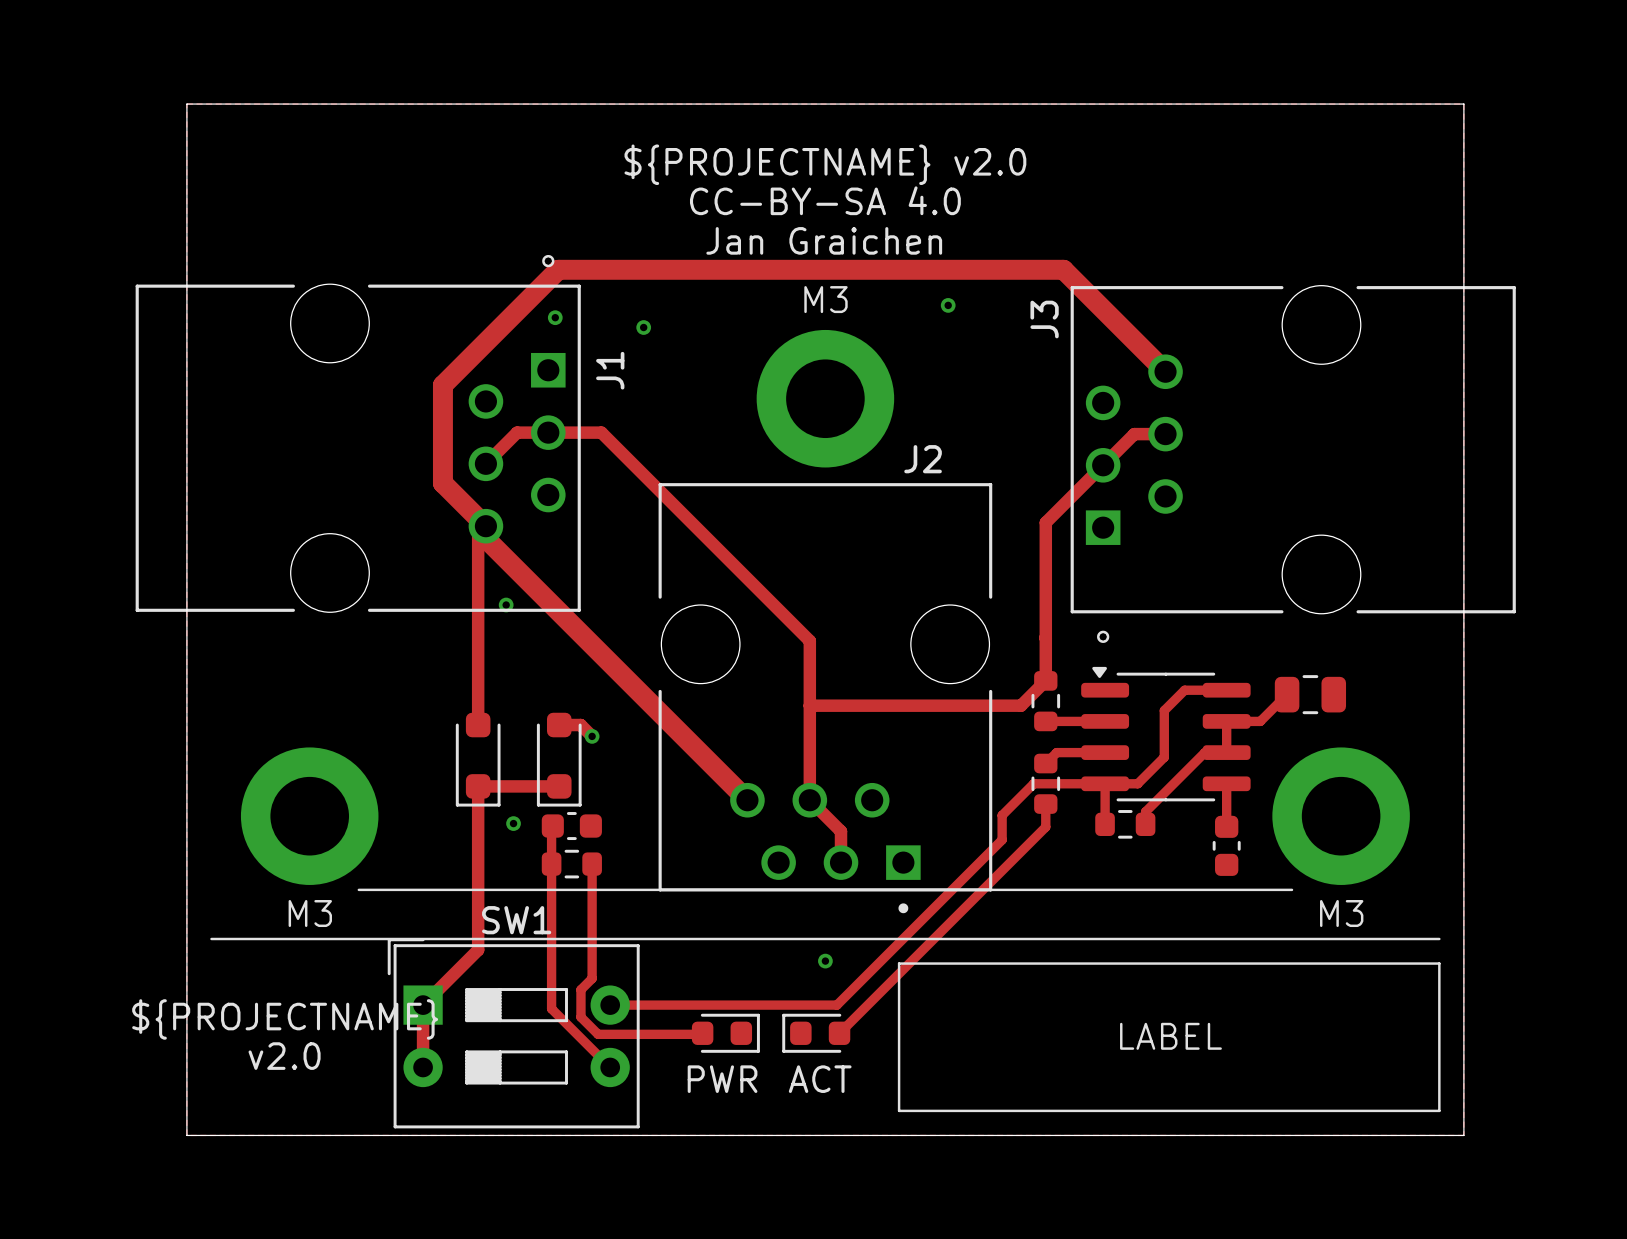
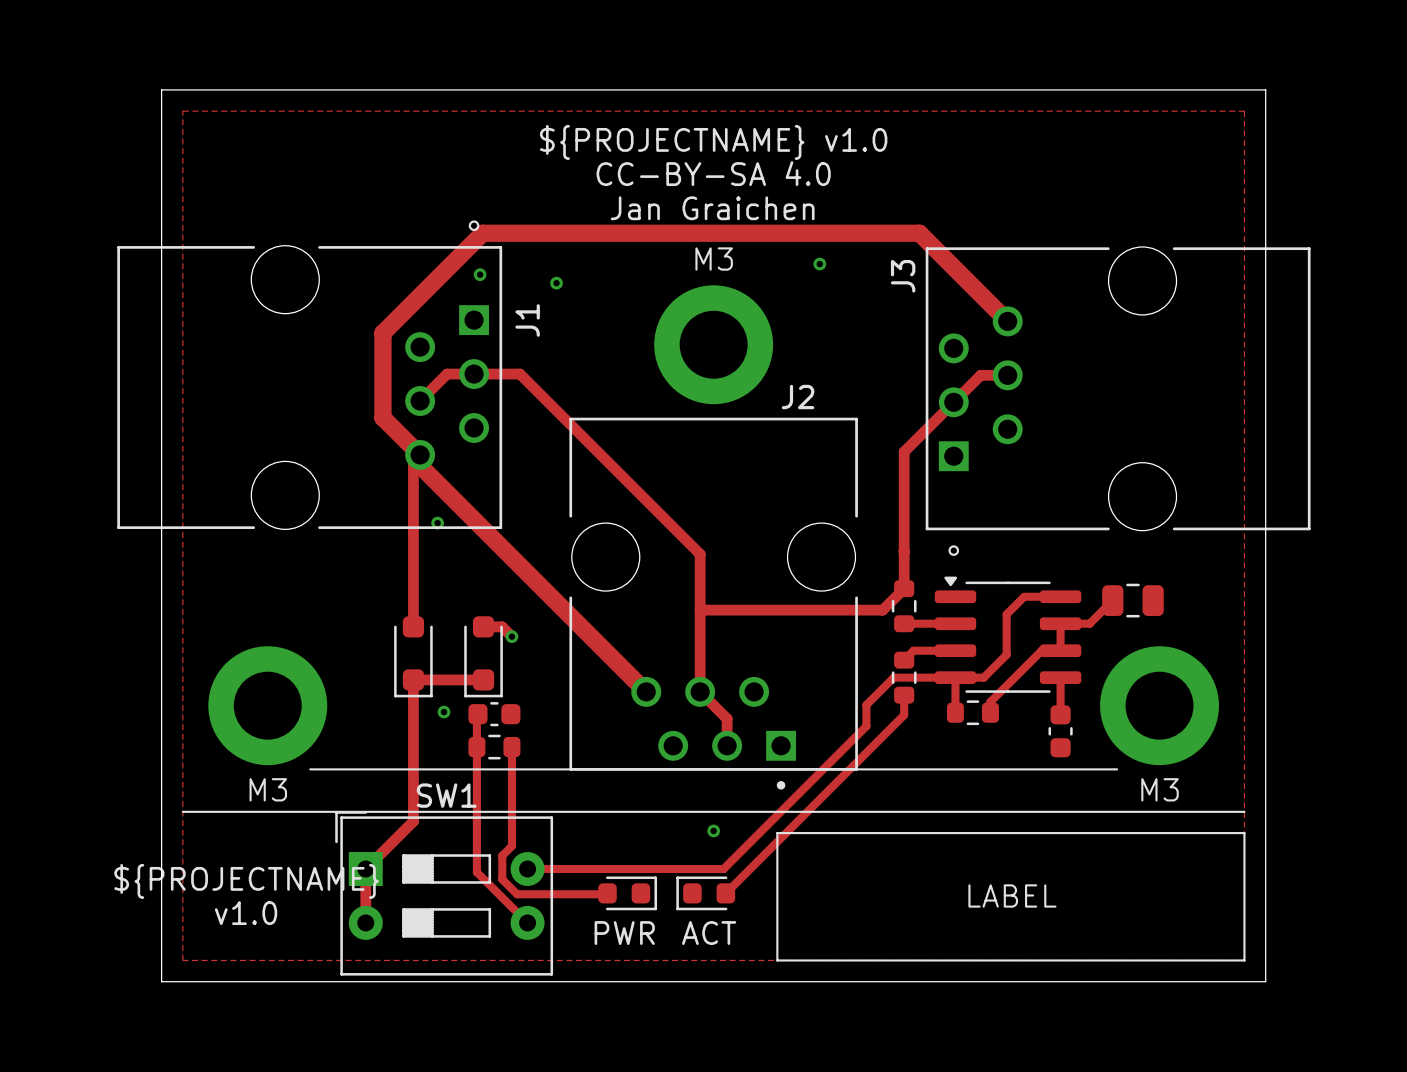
zone outline: (186, 104) (1463, 104) (1463, 1135) (186, 1135) (186, 104) -> (182, 111) (182, 960) (1244, 960) (1244, 111) (182, 111)
text: ${PROJECTNAME} v2.0 (825, 164) -> ${PROJECTNAME} v1.0 (713, 142)
text: v2.0 (284, 1056) -> v1.0 (246, 913)

